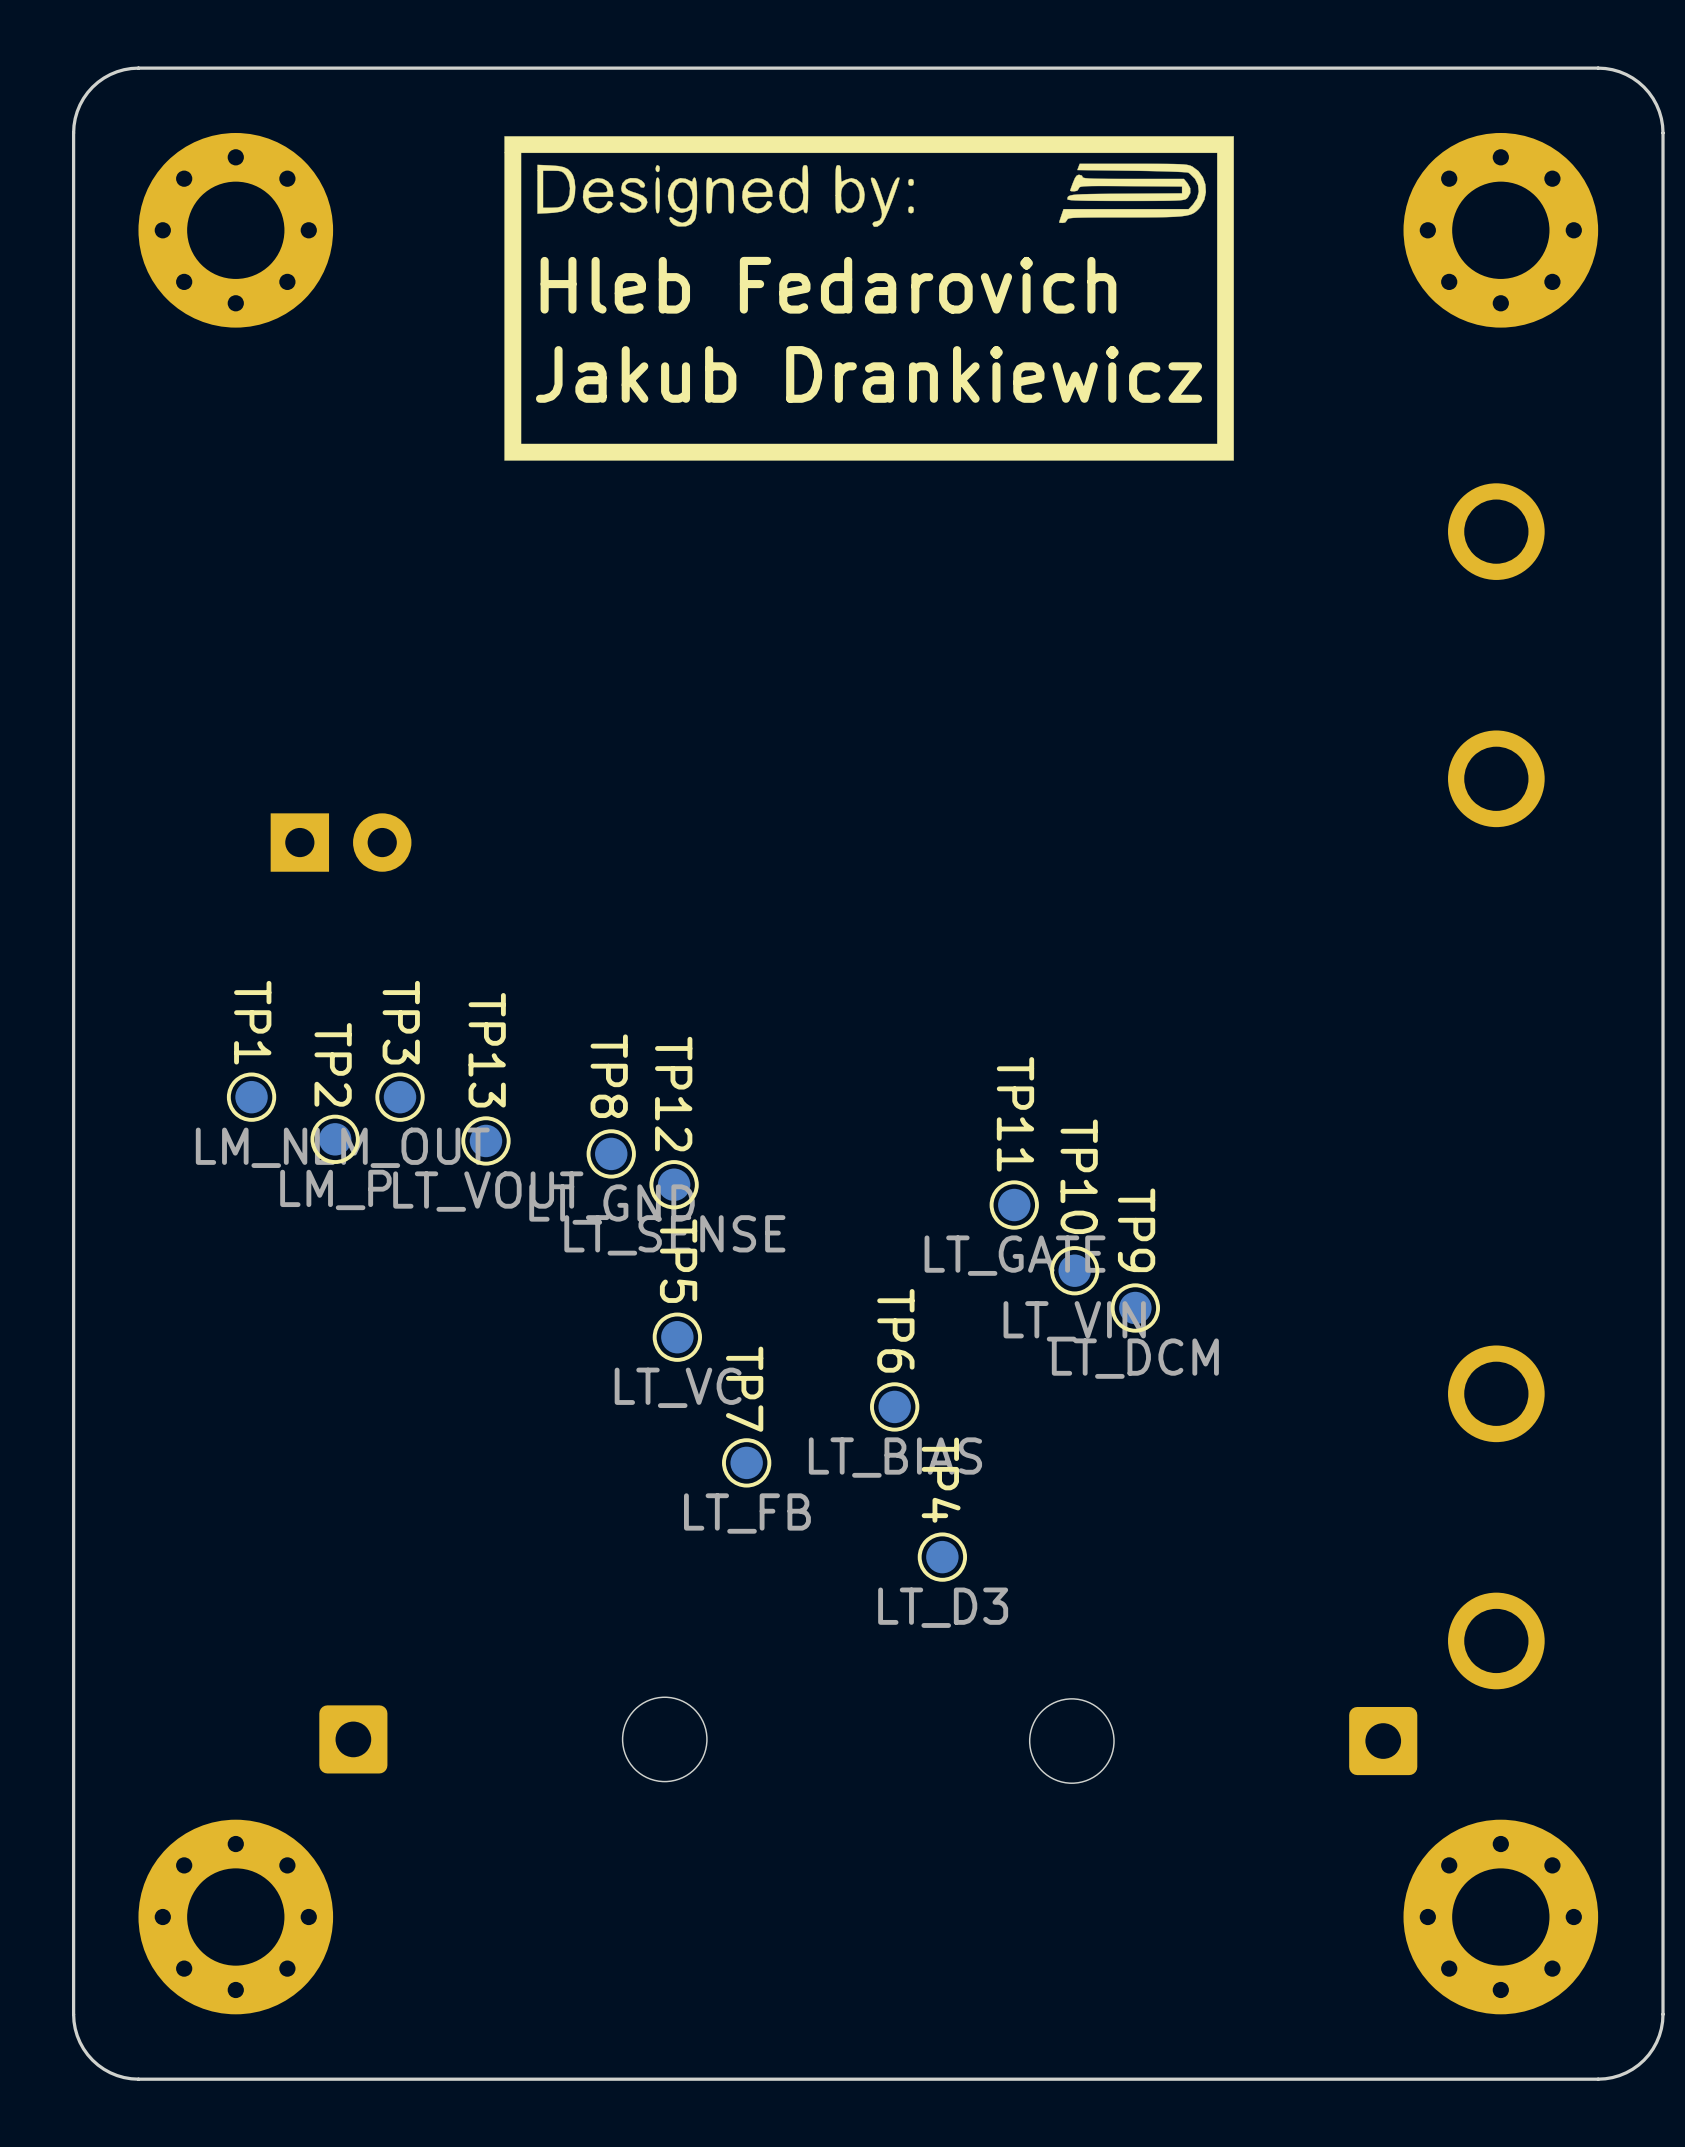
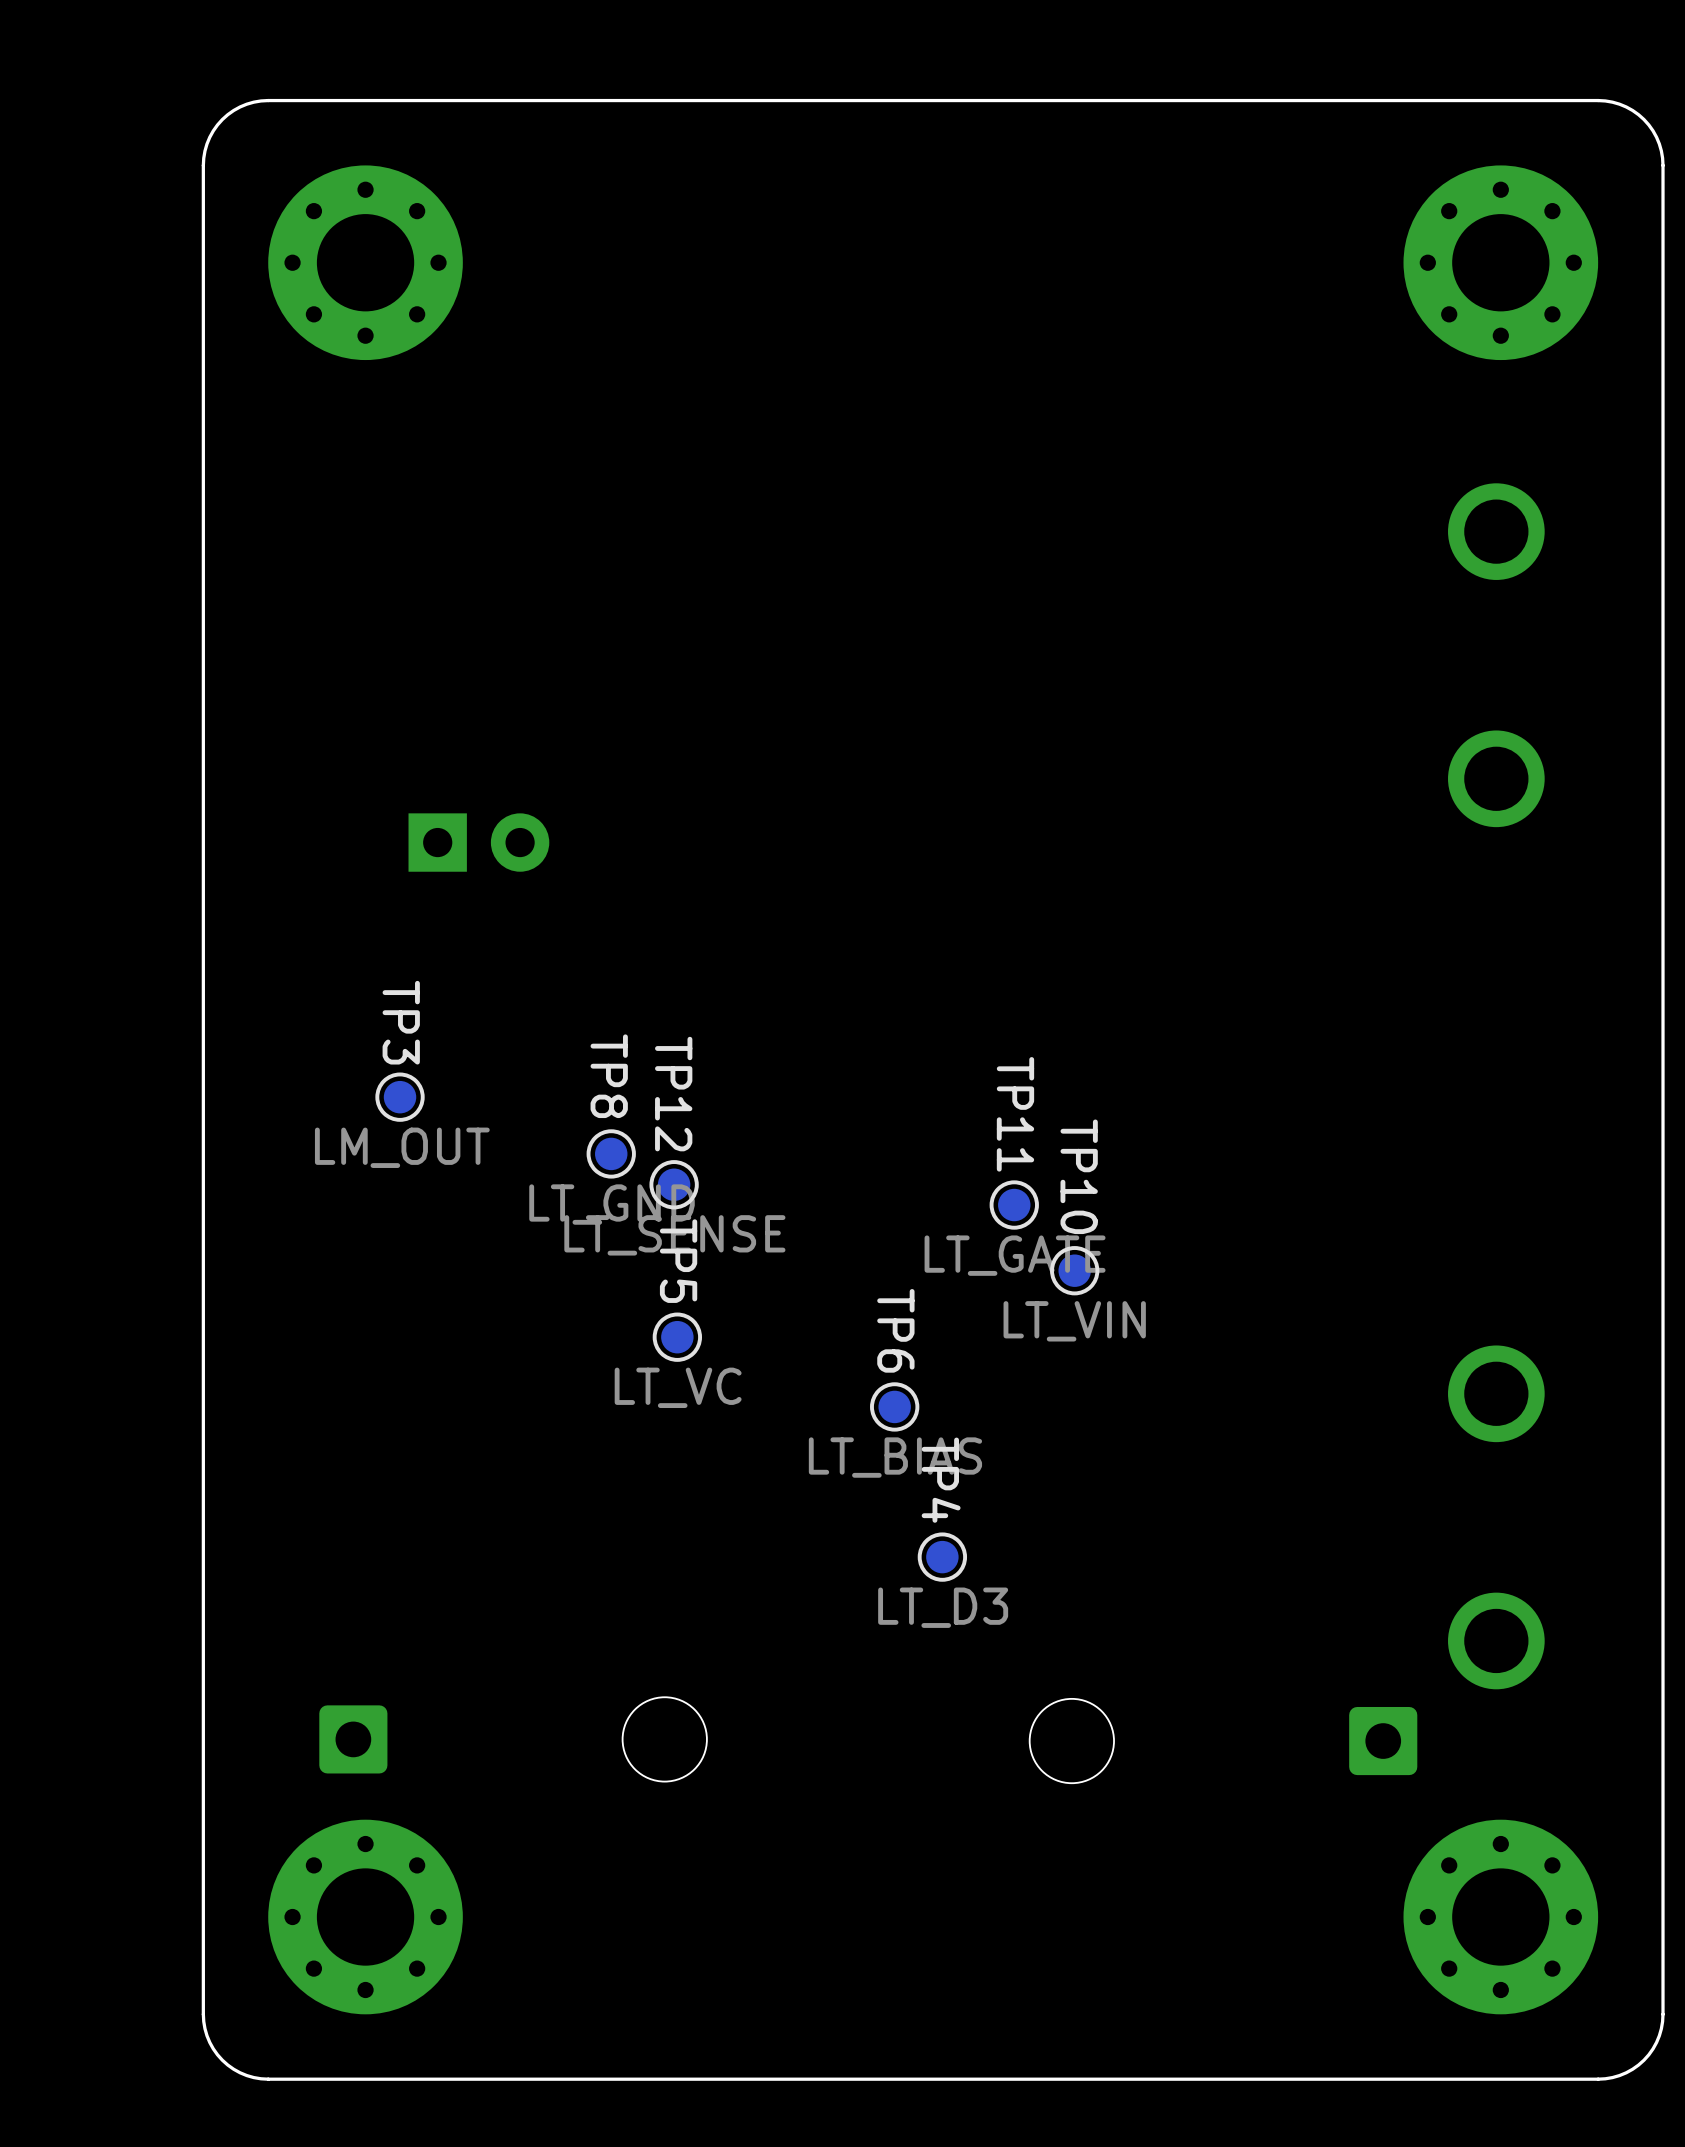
drawing: [504, 136, 1234, 461] -> none
board edge: (1663, 165) (1662, 125) (1659, 111) (1653, 98) (1638, 82) (1626, 74) (1612, 69) (1598, 68) (138, 68) (124, 69) (110, 74) (98, 82) (87, 92) (77, 111) (73, 132) (74, 2021) (80, 2042) (87, 2054) (103, 2069) (117, 2075) (138, 2079) (268, 2079) -> (1663, 165) (1659, 144) (1653, 130) (1644, 119) (1626, 106) (1612, 102) (1598, 100) (268, 100) (253, 102) (240, 106) (227, 114) (217, 124) (206, 144) (203, 165) (203, 2014) (206, 2035) (213, 2048) (222, 2060) (233, 2069) (246, 2075) (268, 2079)
part position: (235, 230) -> (365, 262)
part position: (1500, 230) -> (1500, 262)
text: Hleb Fedarovich (828, 285) -> none
text: Jakub Drankiewicz (869, 374) -> none
part position: (341, 842) -> (478, 842)
TP1: LM_N (251, 1097) -> none
TP2: LM_P (335, 1139) -> none
TP13: LT_VOUT (485, 1140) -> none
TP9: LT_DCM (1135, 1308) -> none
TP7: LT_FB (746, 1462) -> none
part position: (235, 1917) -> (365, 1917)

